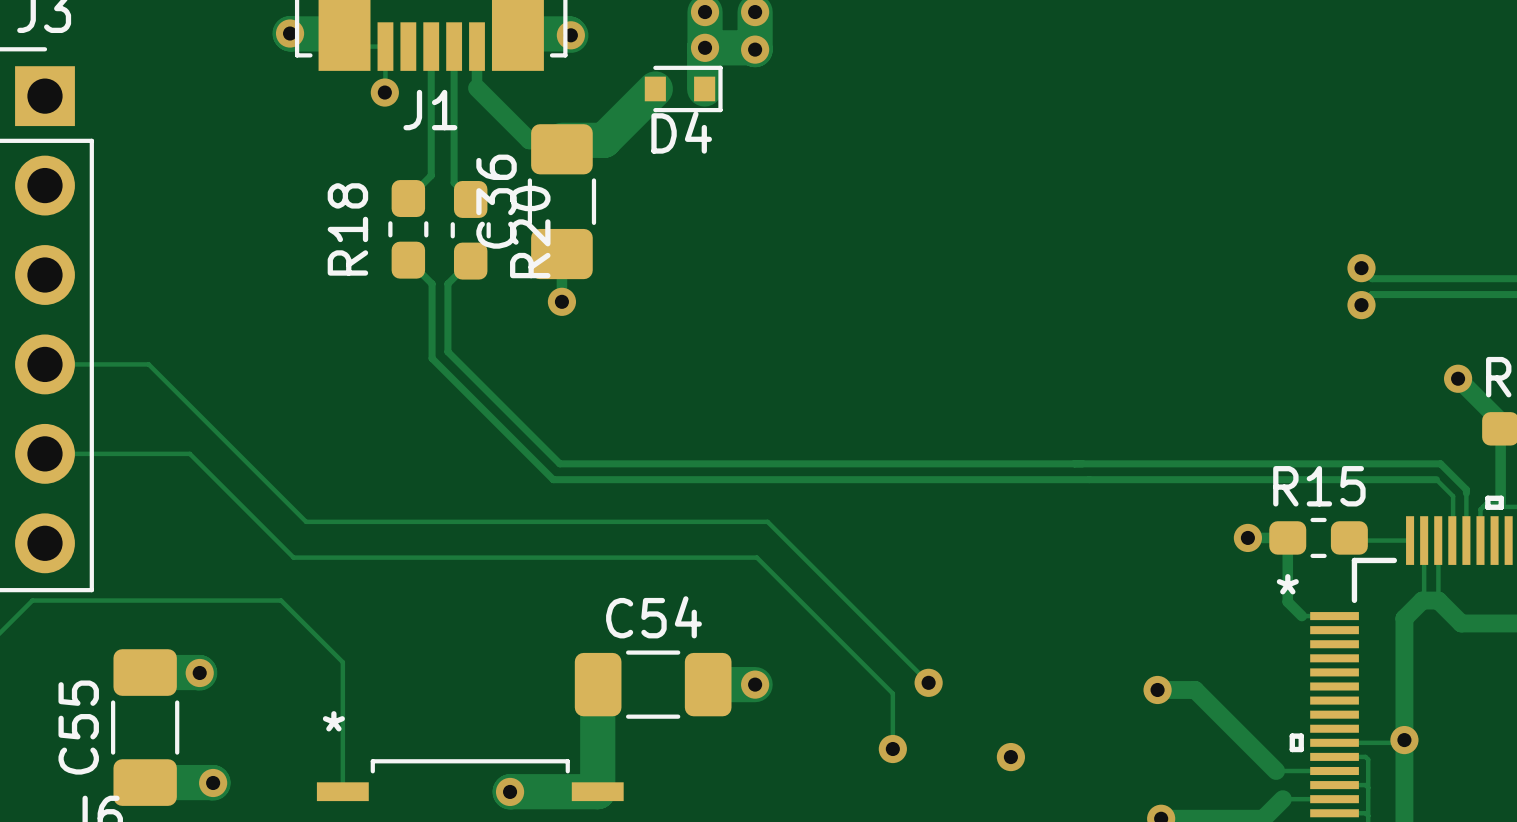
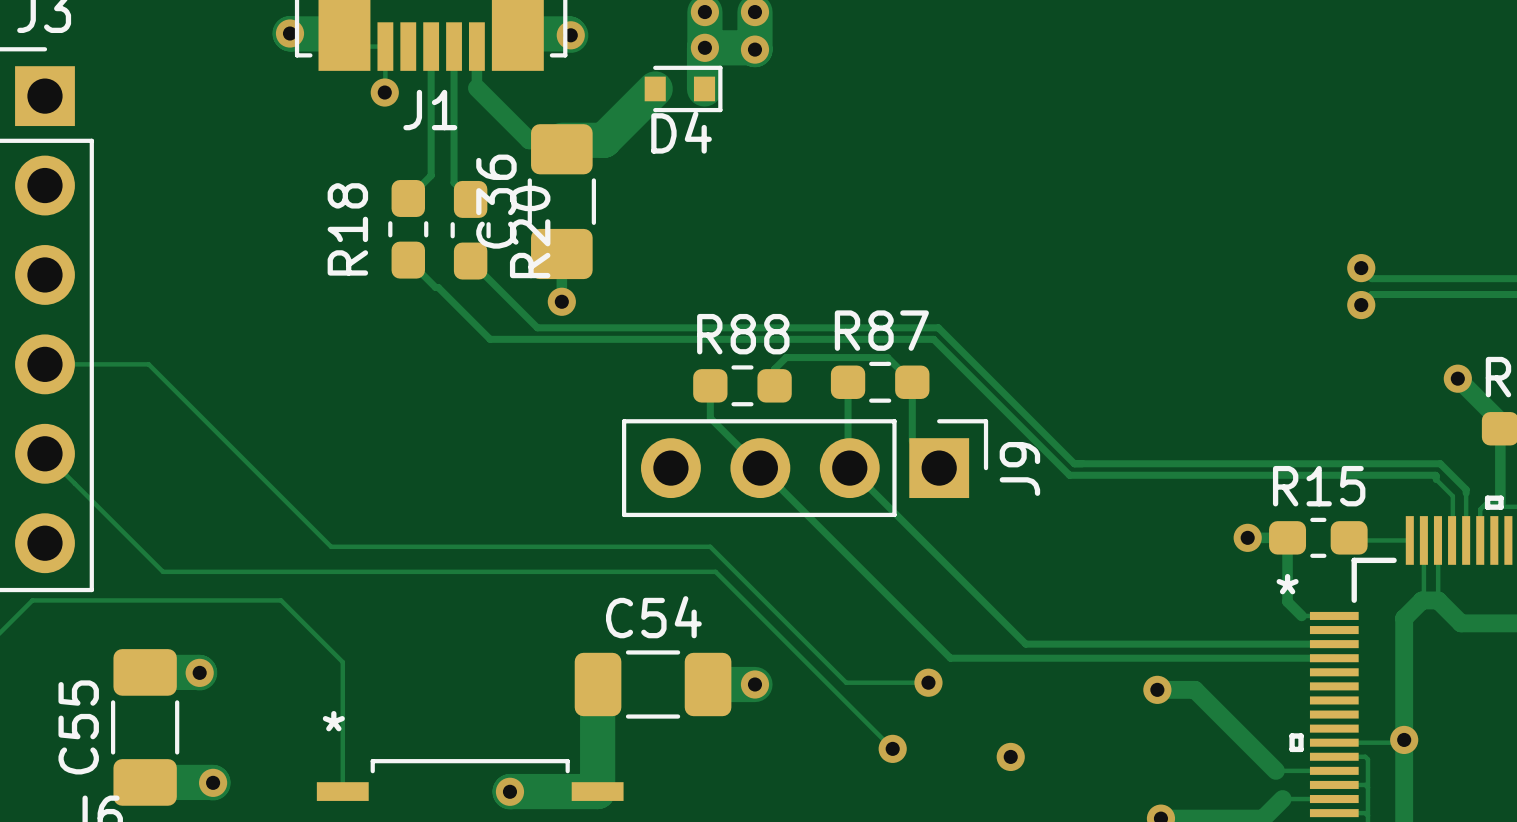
track: (470, 261) (447, 283) (447, 351) (559, 463) (1074, 463) -> (470, 261) (537, 327) (938, 327) (1074, 463)
track: (432, 283) (432, 358) (553, 479) (1436, 479) -> (432, 283) (438, 287) (490, 339) (933, 339) (1069, 475) (1435, 475) (1436, 479)
track: none -> (848, 382) (848, 466) (1025, 644) (1334, 644)
R87: none -> (880, 382)
track: none -> (710, 385) (710, 418) (950, 658) (1334, 658)
R88: none -> (742, 385)
track: none -> (774, 385) (774, 369) (786, 357) (887, 357) (912, 382) (912, 441) (939, 468)
track: (44, 453) (189, 453) (293, 557) (756, 557) (892, 693) (892, 749) -> (44, 453) (163, 571) (715, 571) (892, 748)
J9: none -> (805, 468)
track: (306, 521) (767, 521) (928, 682) -> (306, 521) (331, 546) (710, 546) (846, 682) (928, 682)

